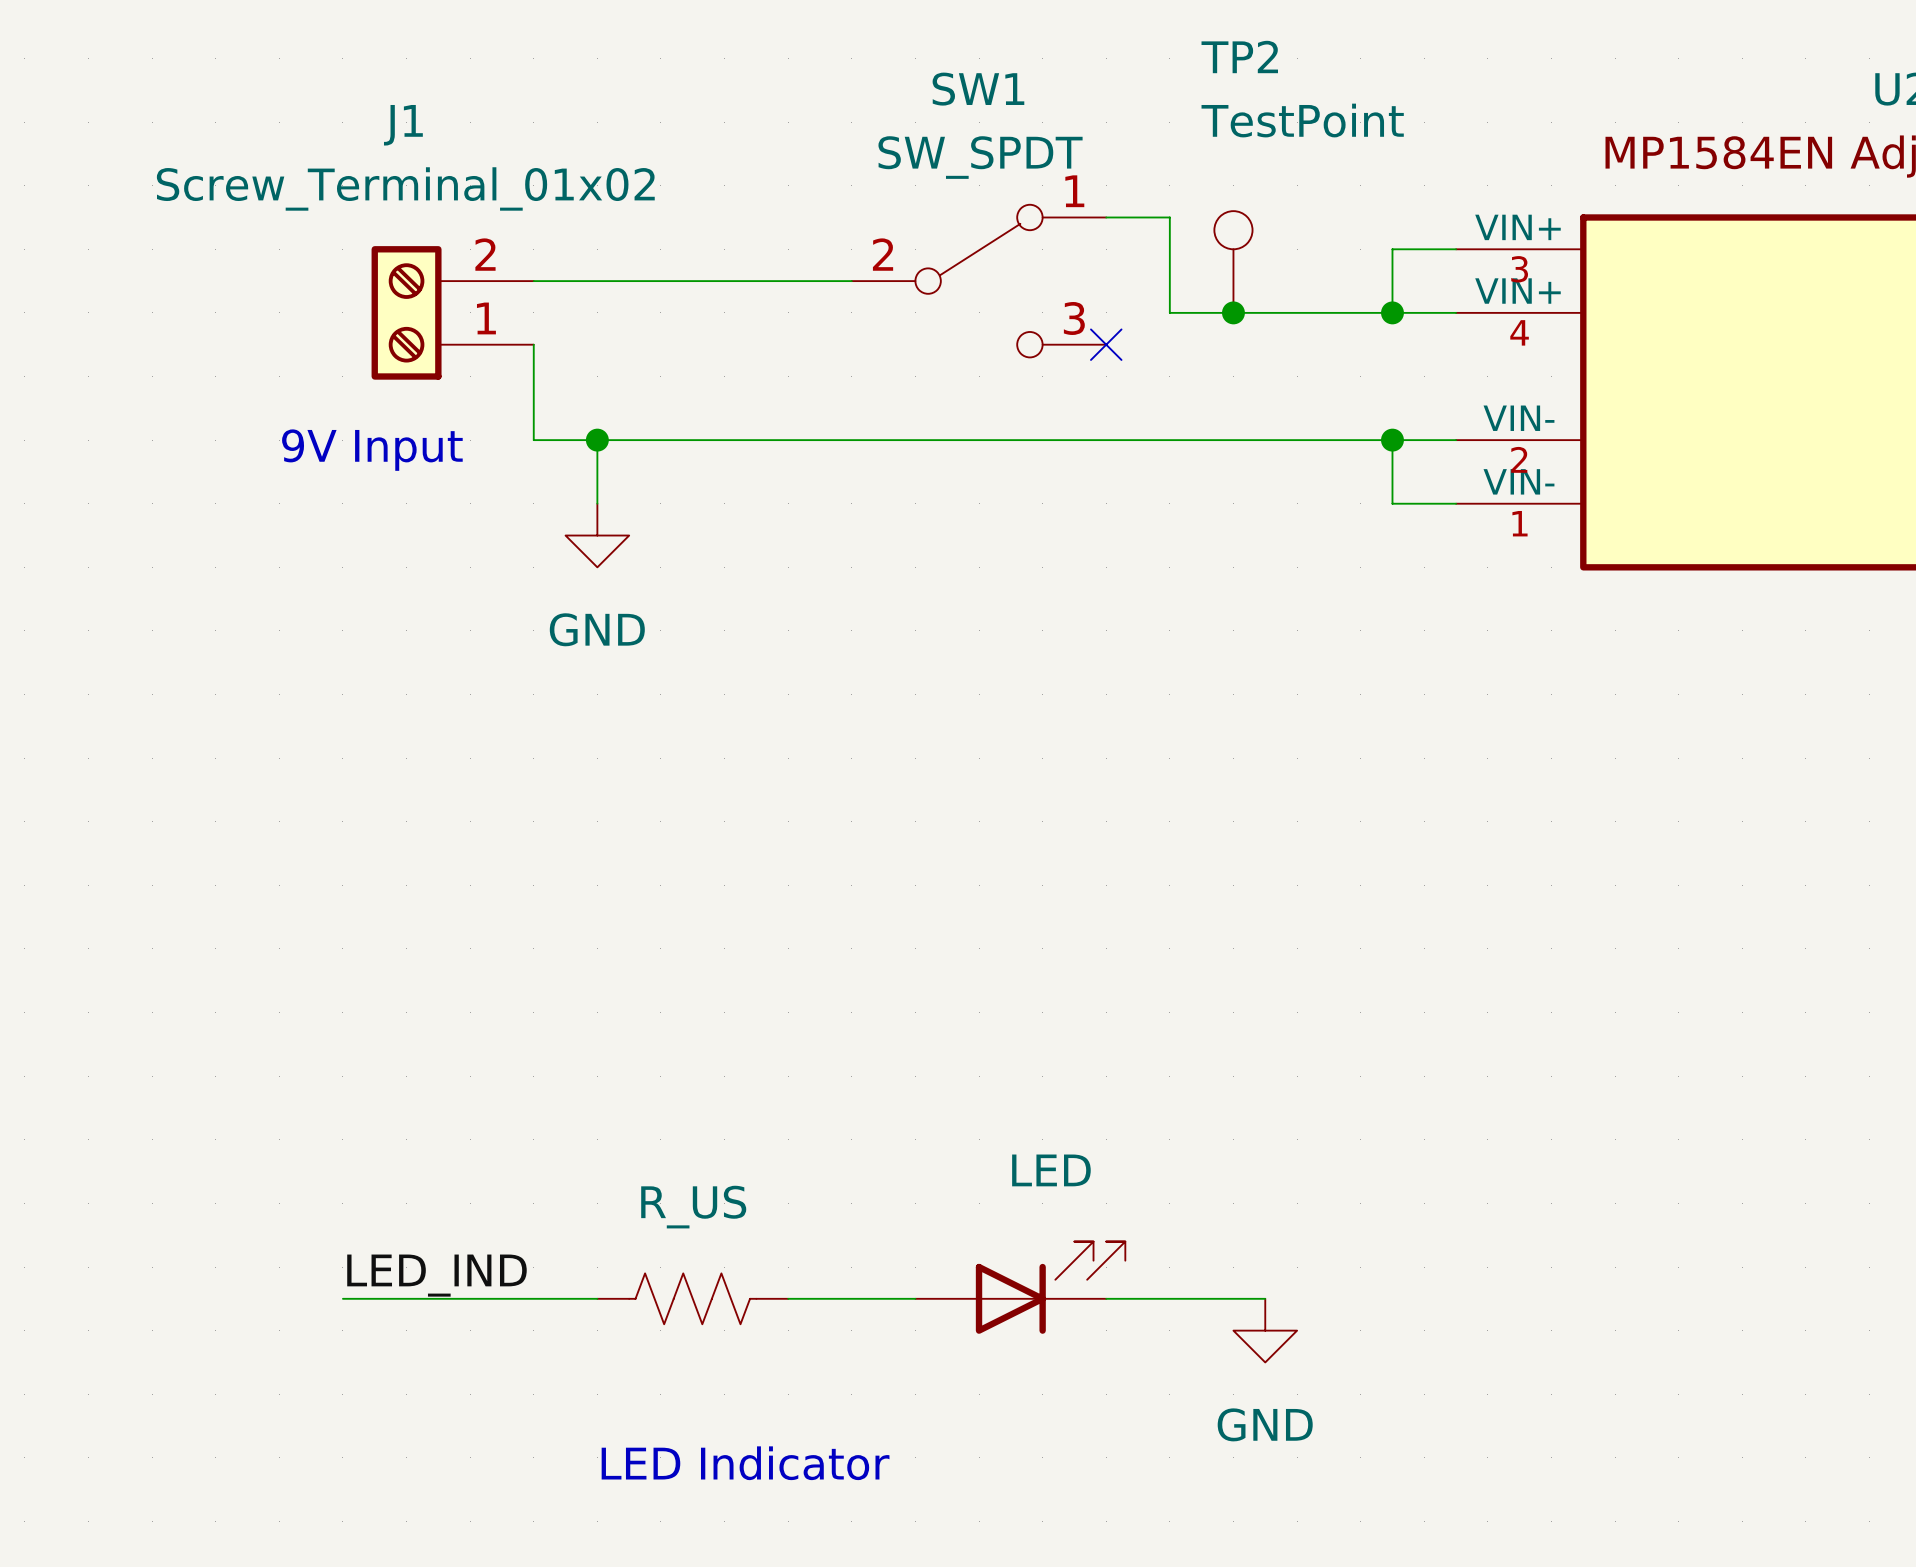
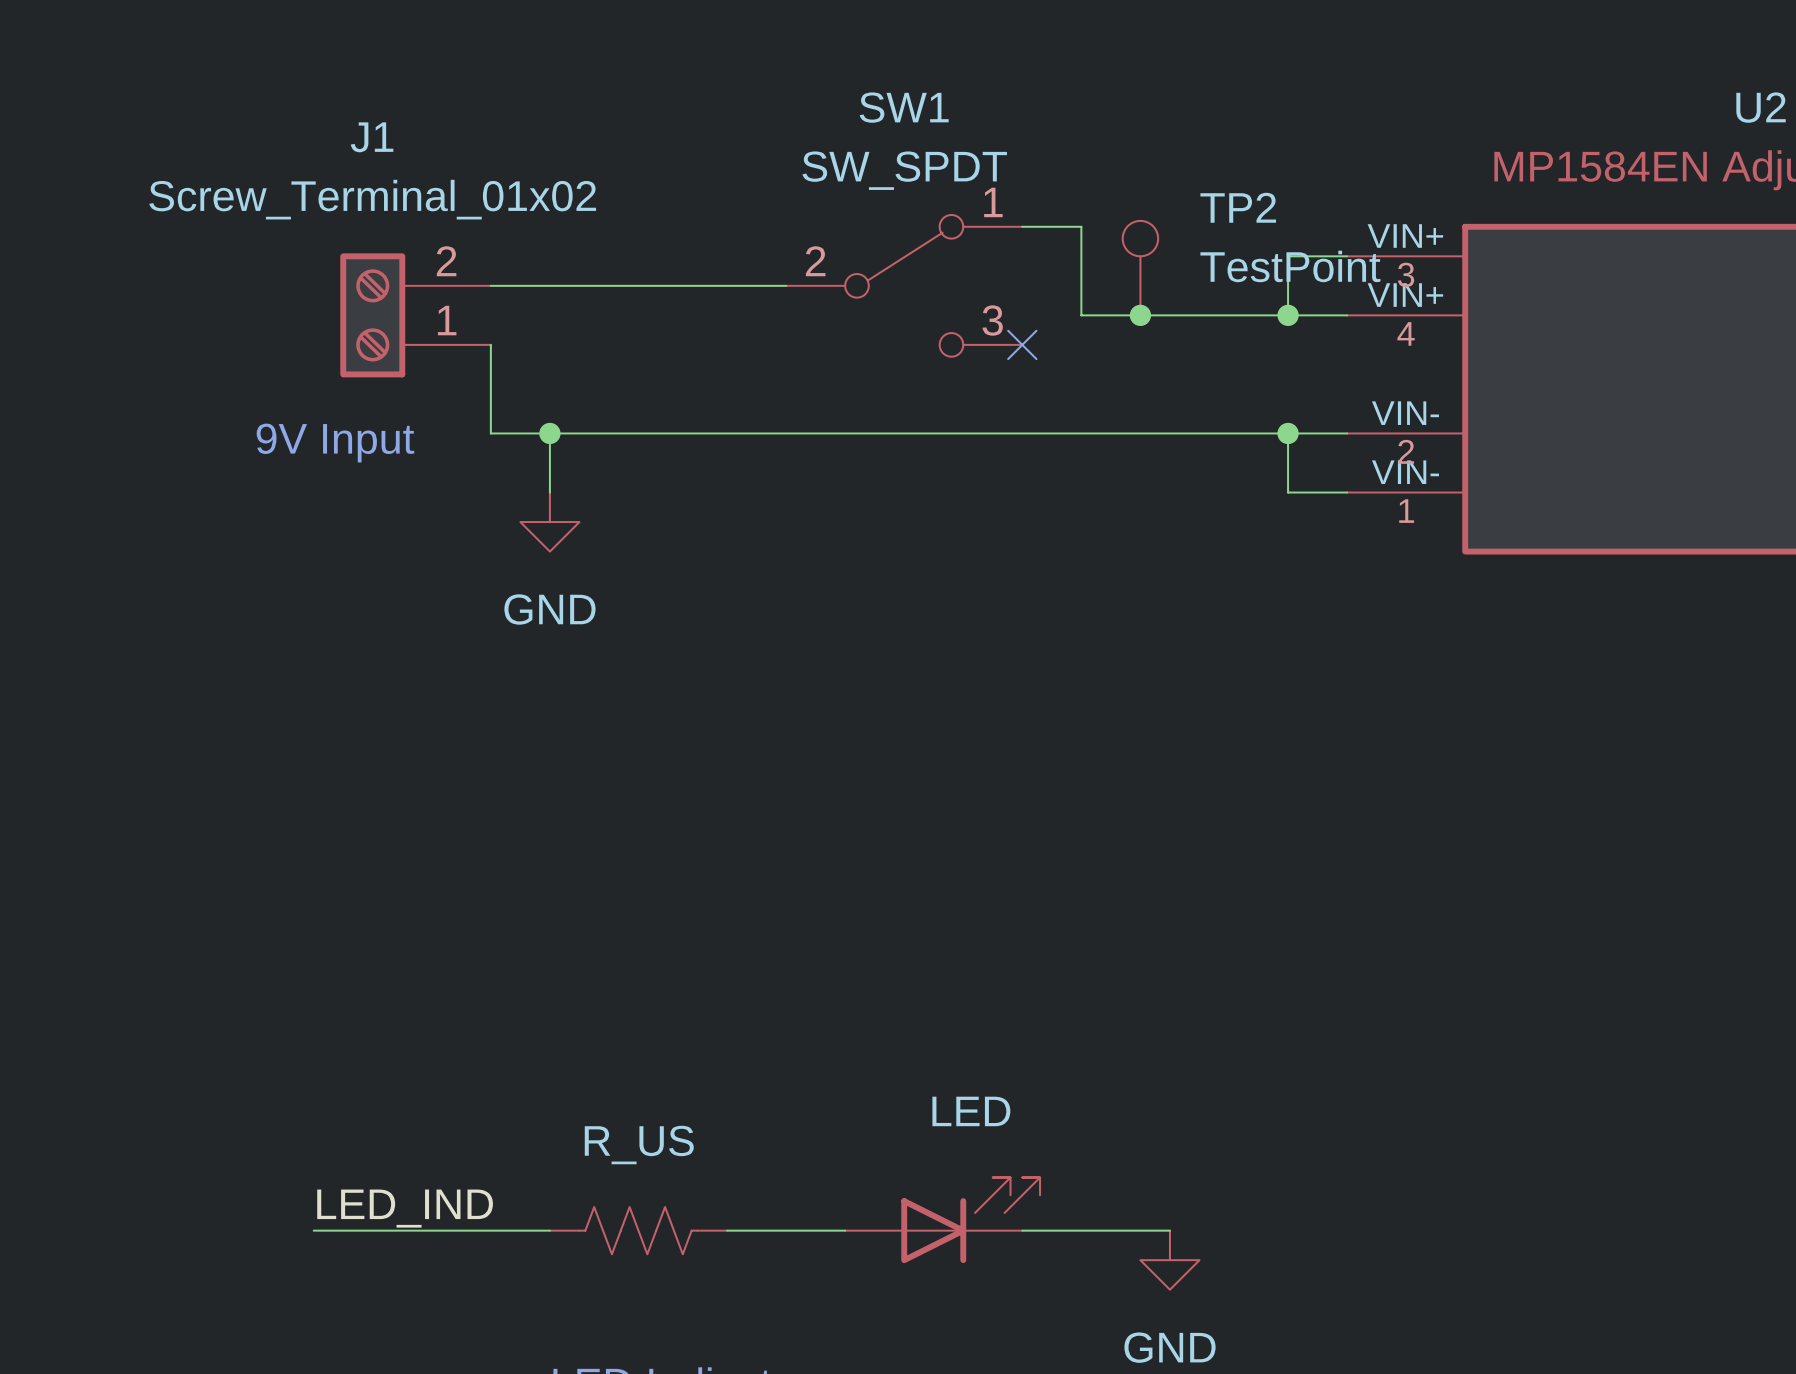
TP2 name position: TP2 (1239, 56) -> TP2 (1238, 207)
TP2 value position: TestPoint (1302, 120) -> TestPoint (1290, 266)

